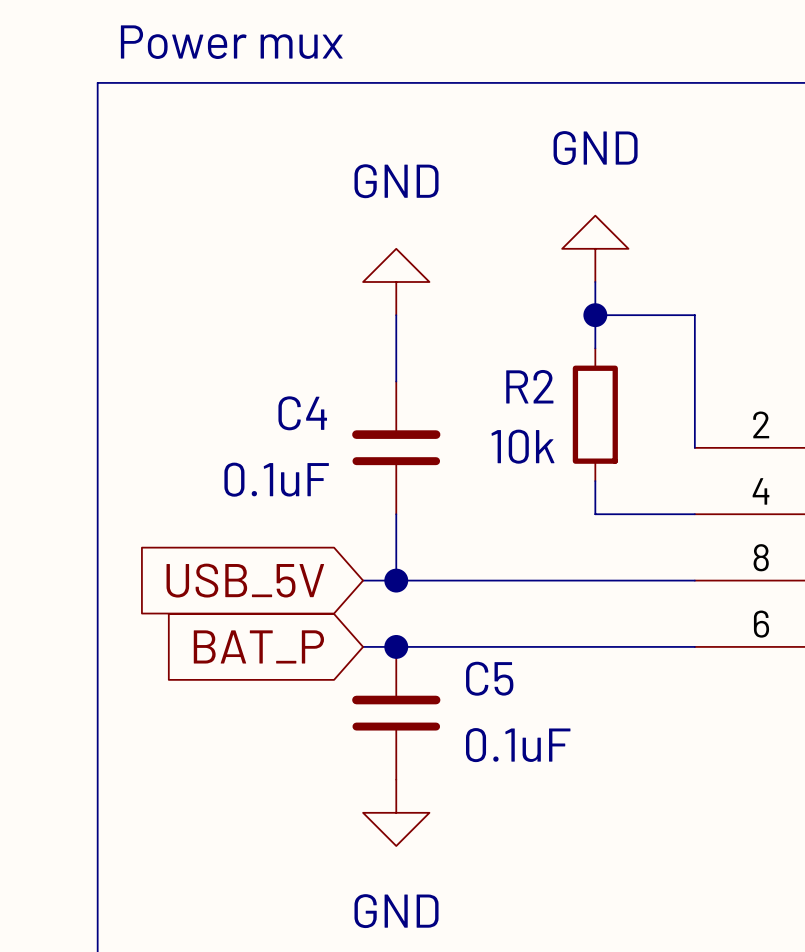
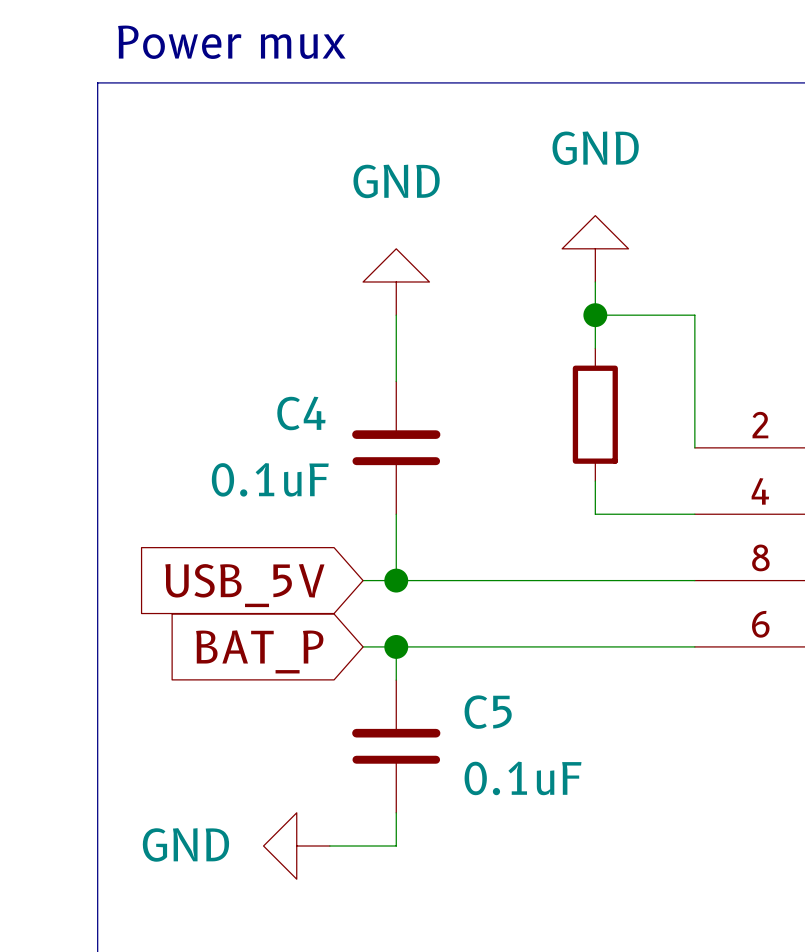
R2 name: R2 (529, 386) -> none
R2 value: 10k (523, 446) -> none
C5 position: (396, 713) -> (396, 746)
wire: none -> (396, 812) (396, 846) (329, 846)
power symbol rotation: 0° (396, 812) -> 90° clockwise (296, 846)
power symbol position: GND (396, 812) -> GND (296, 846)

